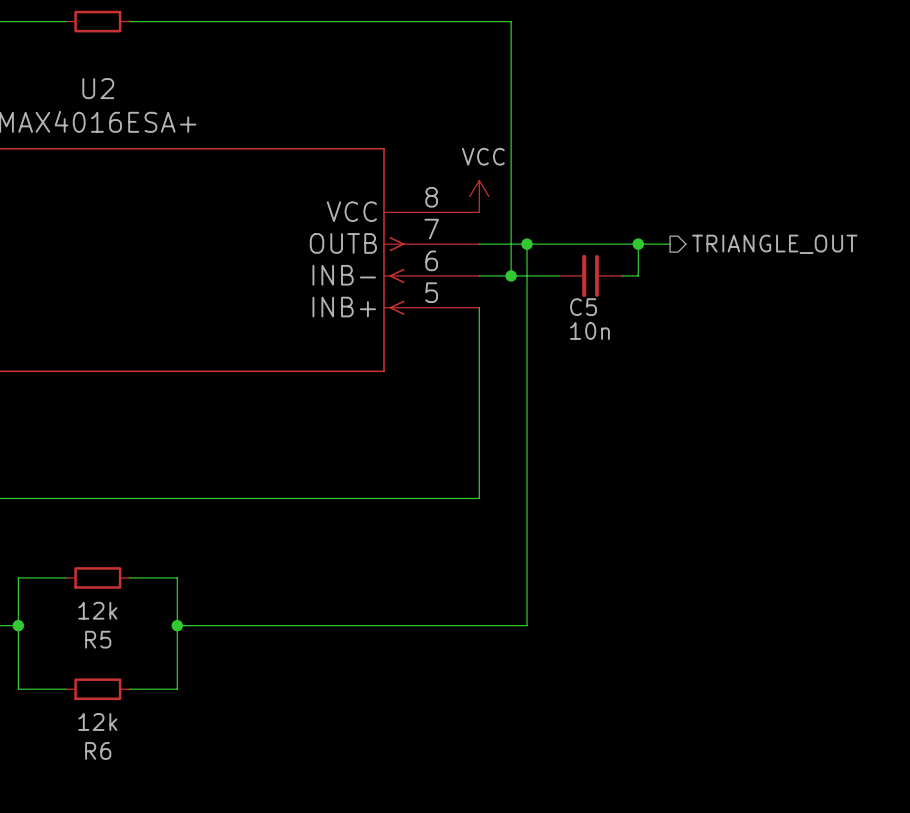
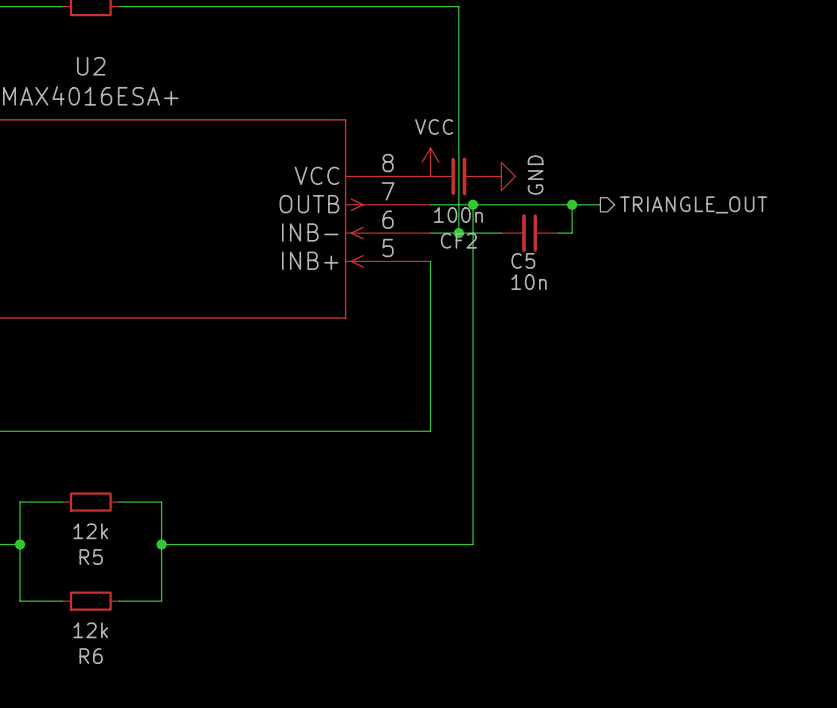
CF2: none -> 100n (458, 176)
power symbol: none -> GND (501, 176)

